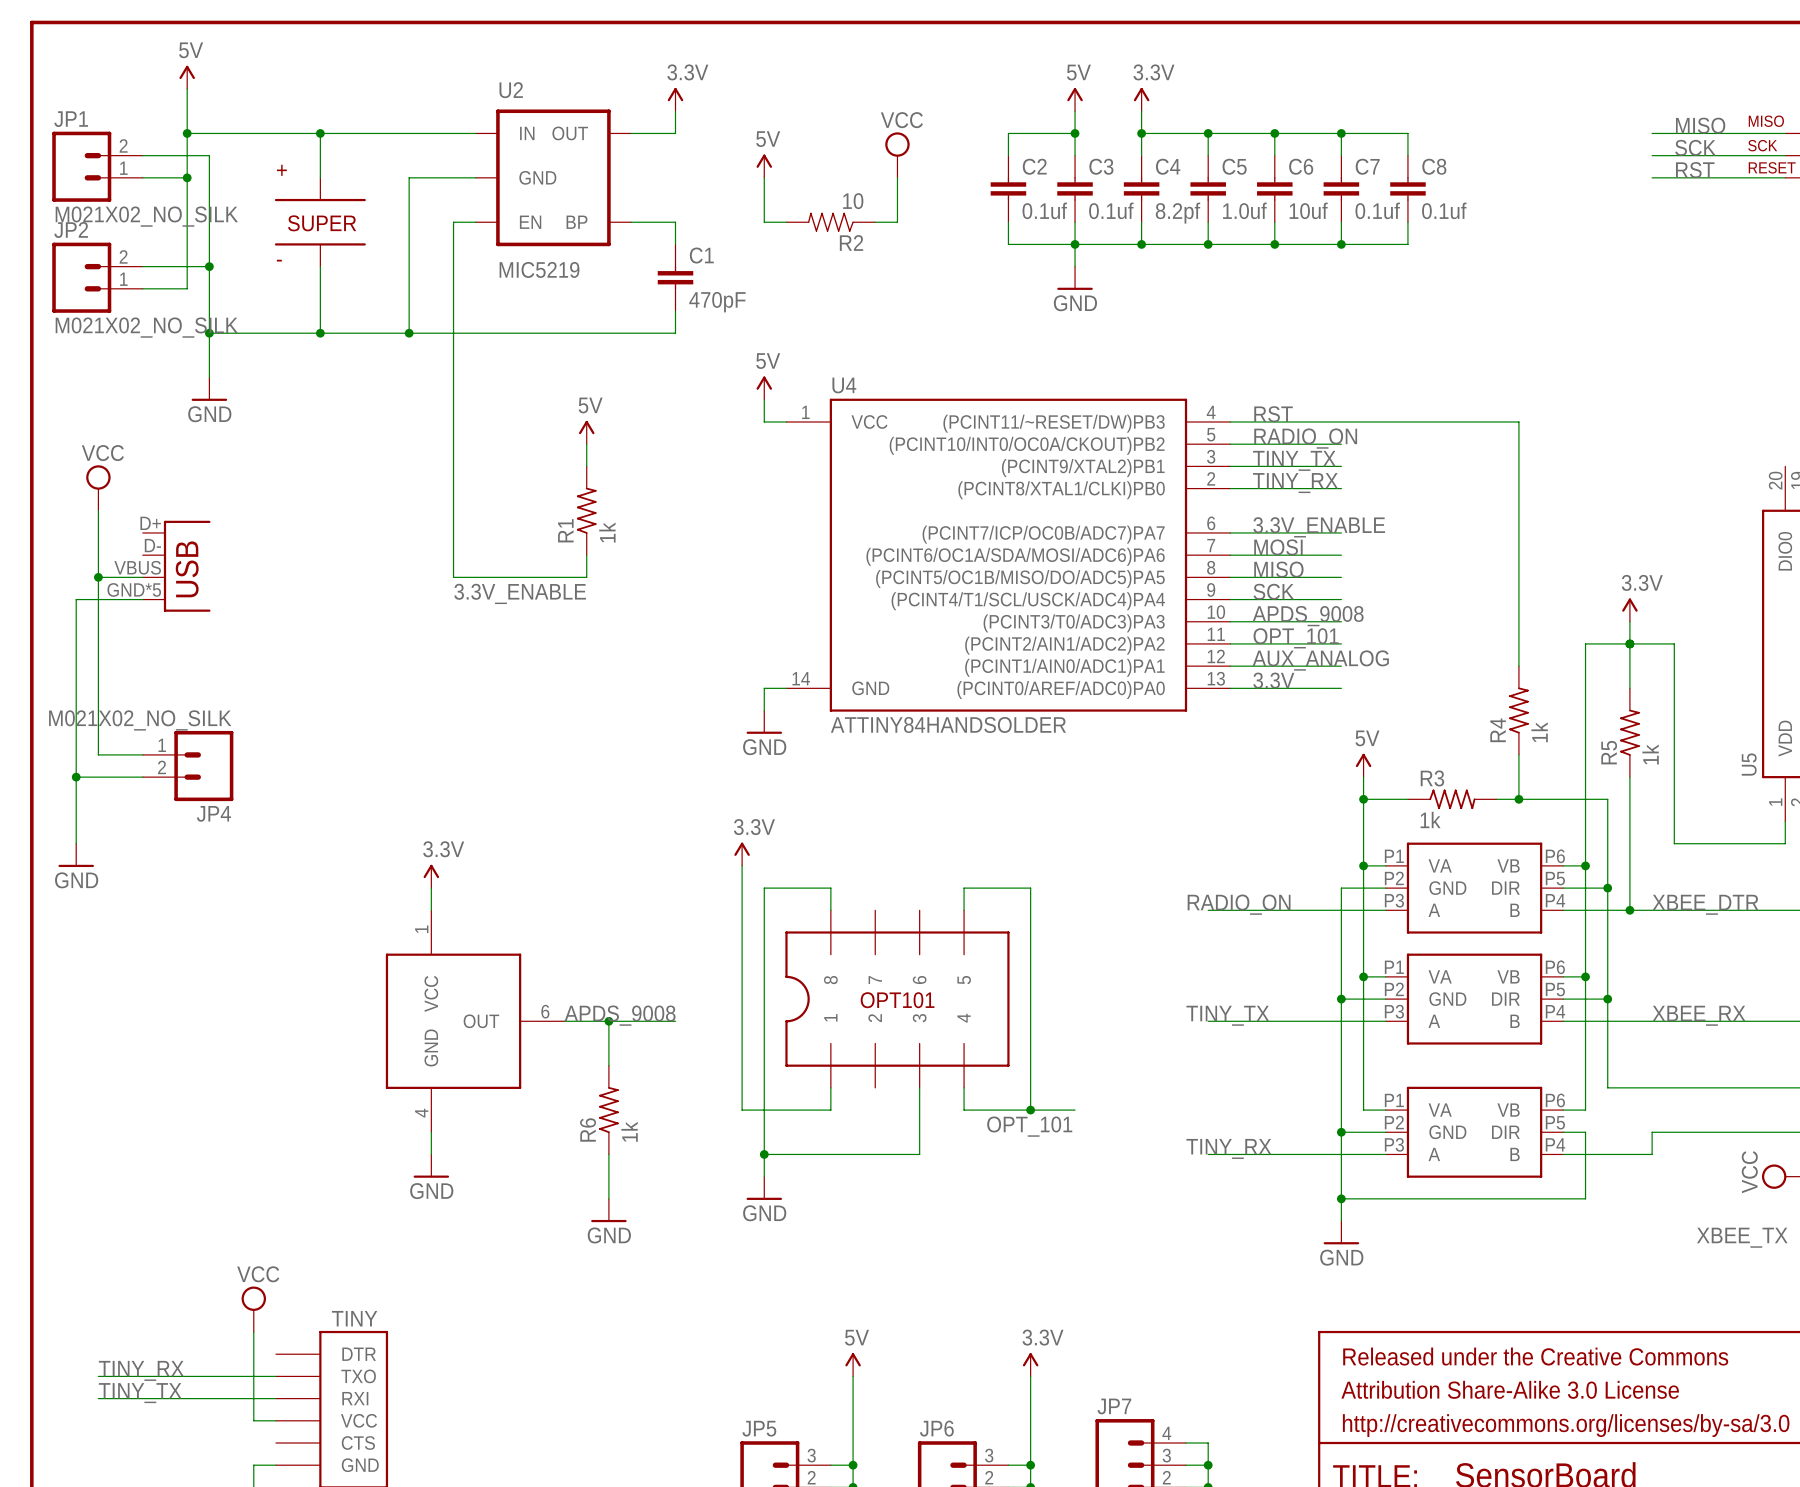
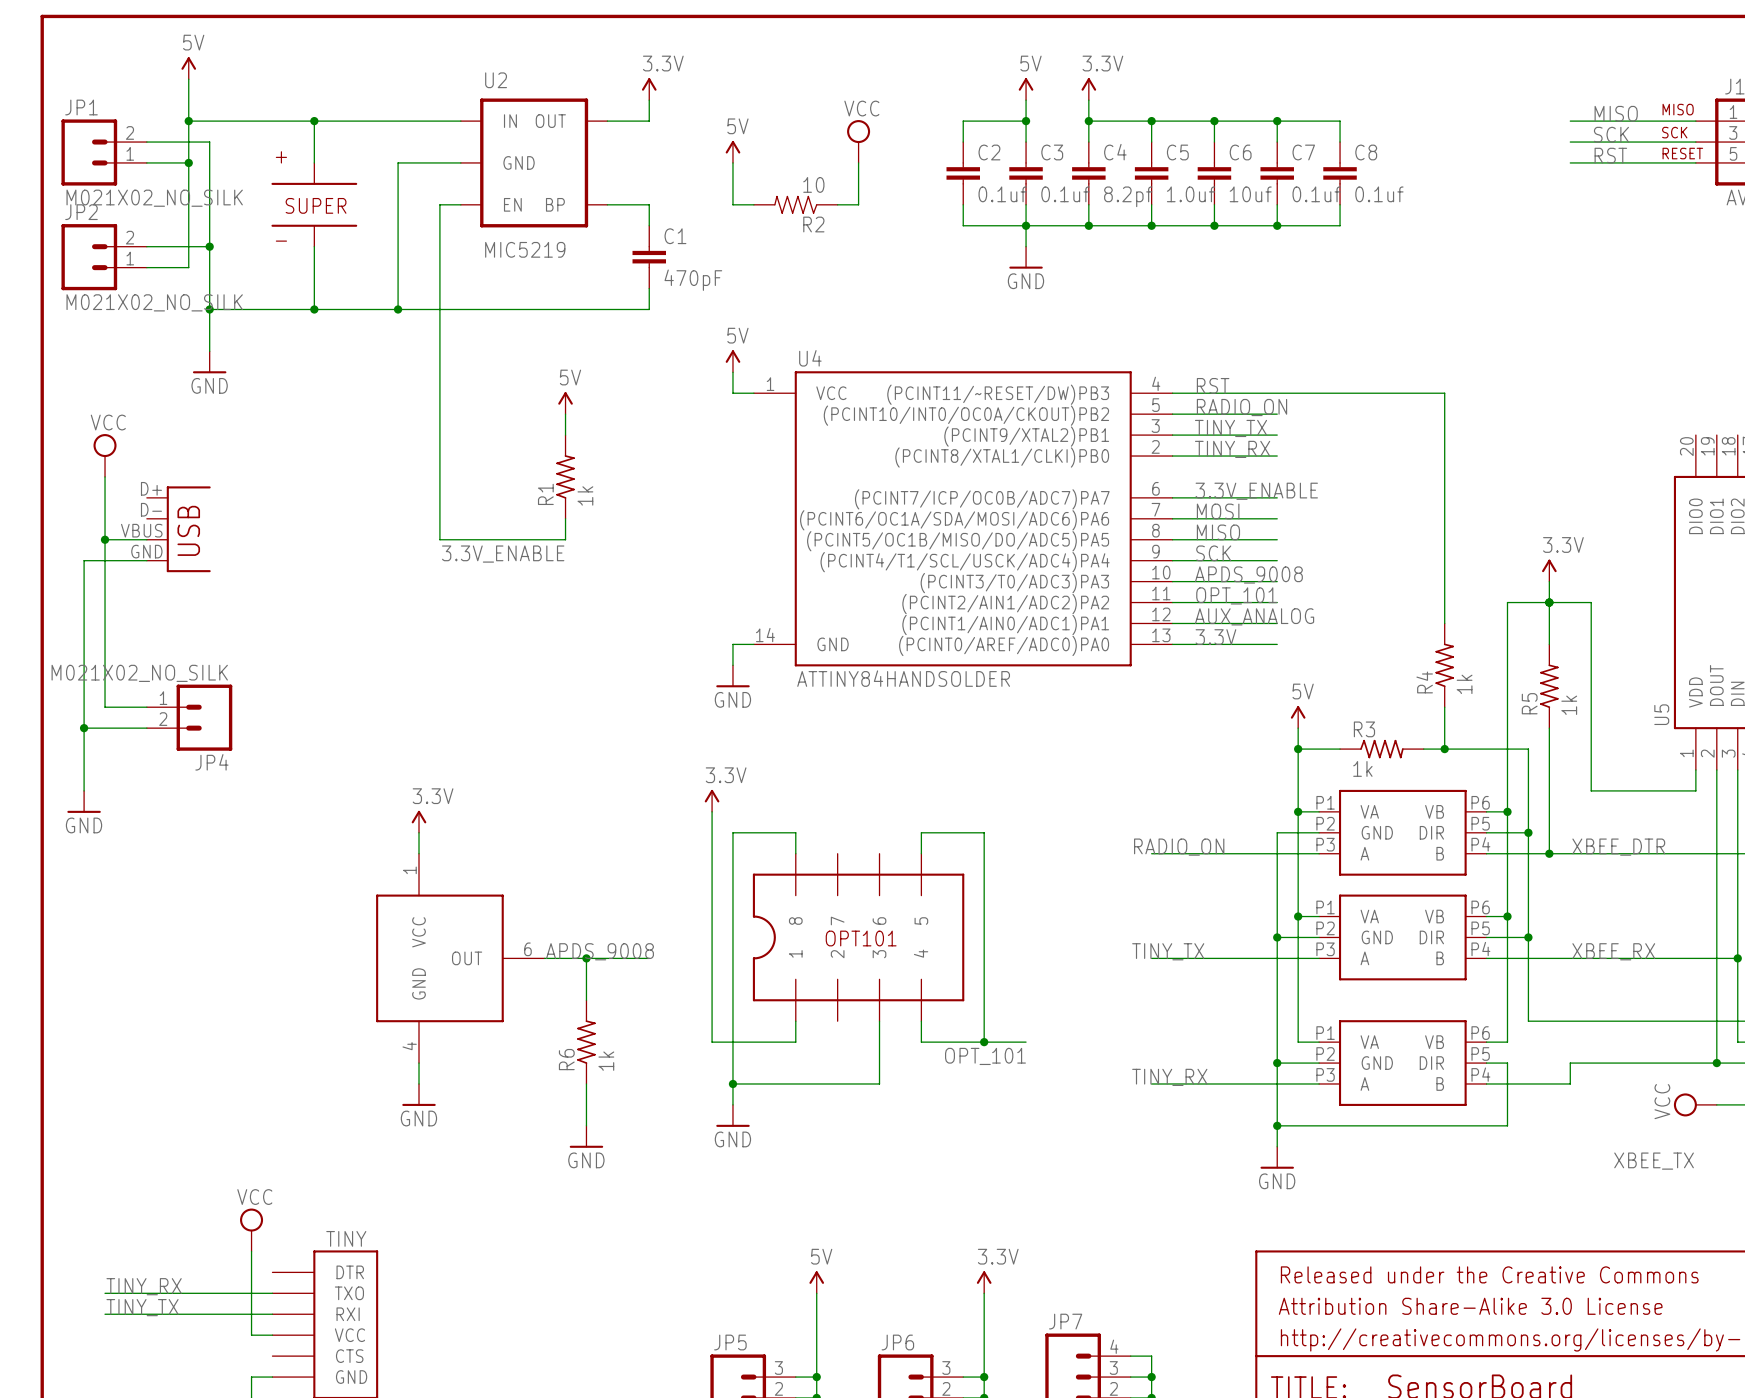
part pin number: GND*5 (134, 589) -> GND (146, 551)

